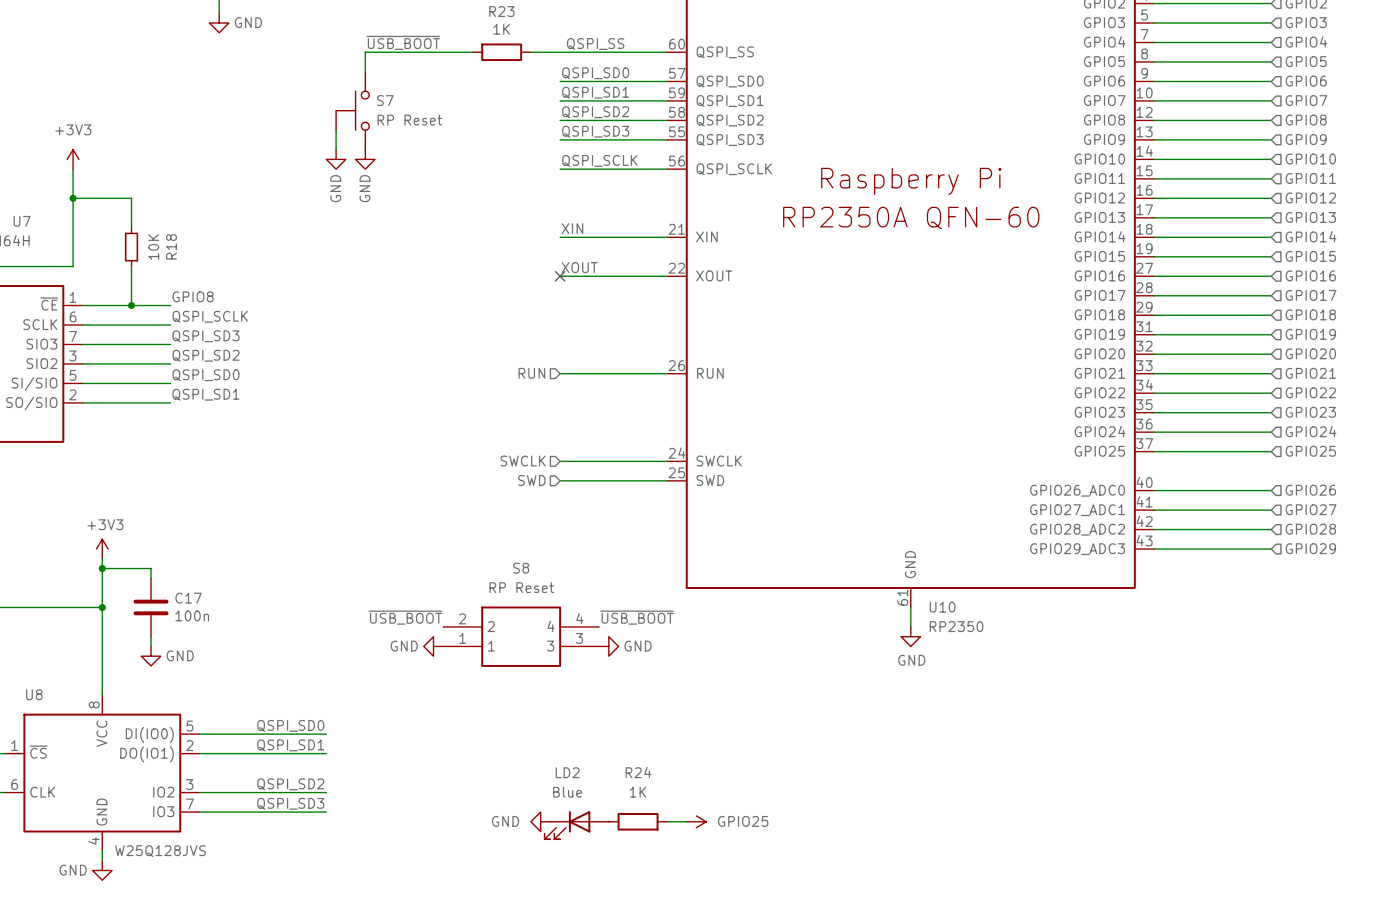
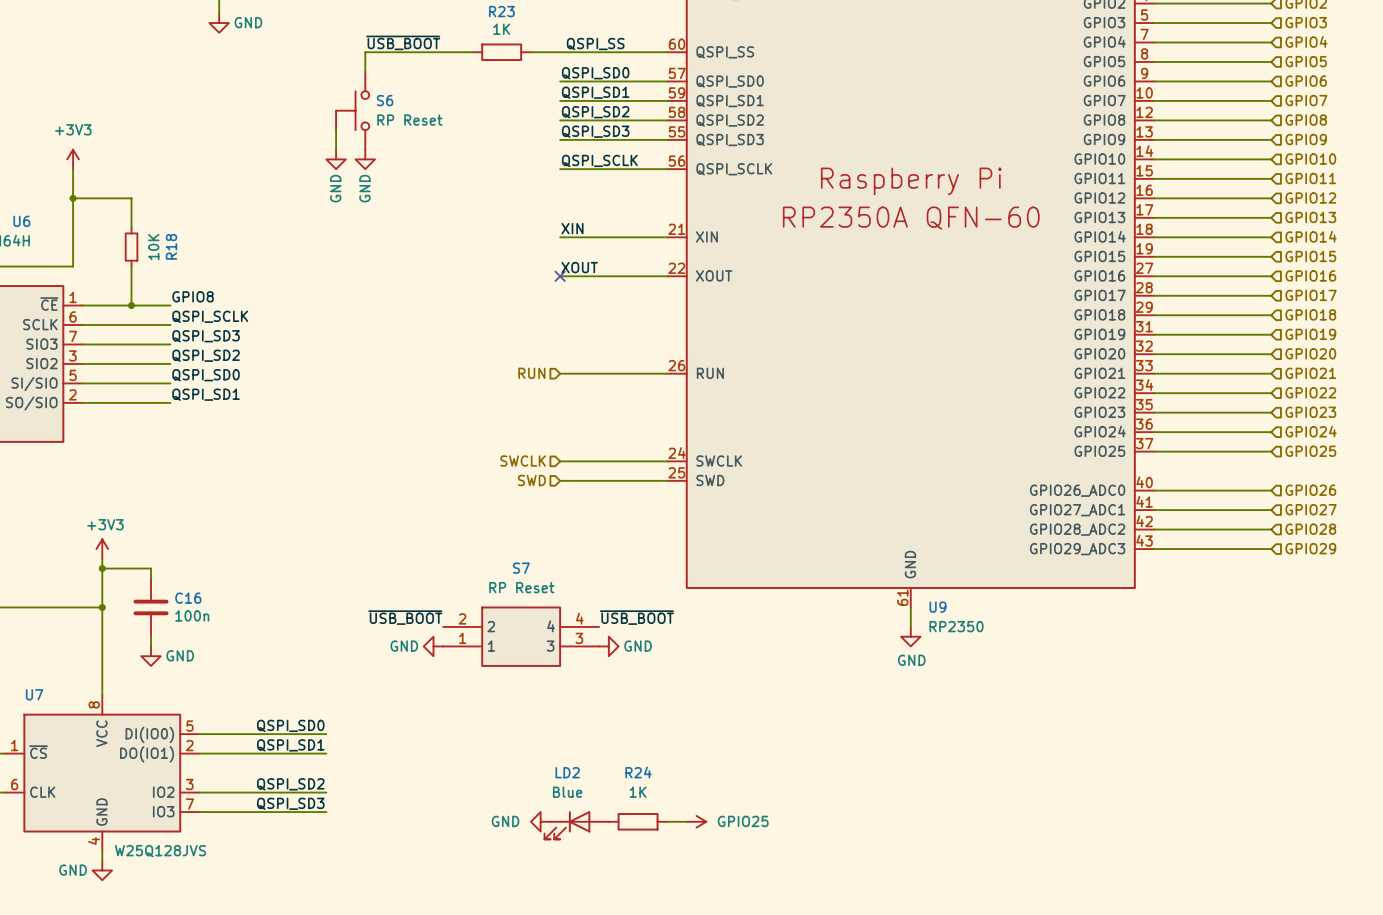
S7 name: S7 (385, 100) -> S6 (385, 100)
U7 name: U7 (22, 221) -> U6 (21, 221)
S8 name: S8 (521, 568) -> S7 (521, 568)
C17 name: C17 (188, 598) -> C16 (188, 598)
U10 name: U10 (942, 607) -> U9 (937, 607)
U8 name: U8 (34, 694) -> U7 (34, 694)

